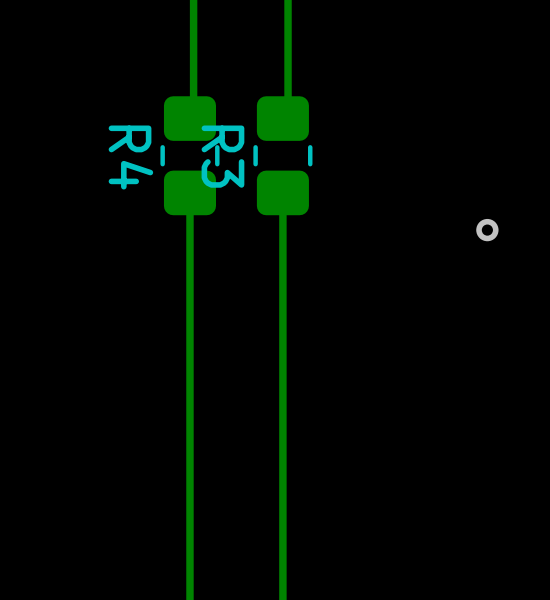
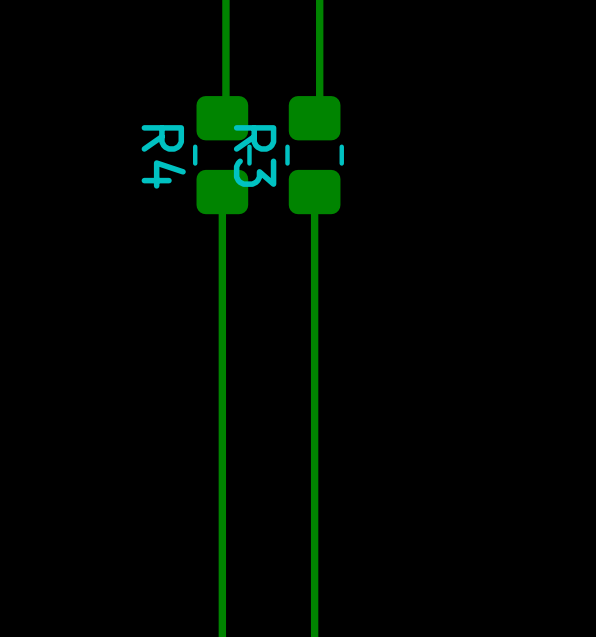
via: (487, 230) -> none

